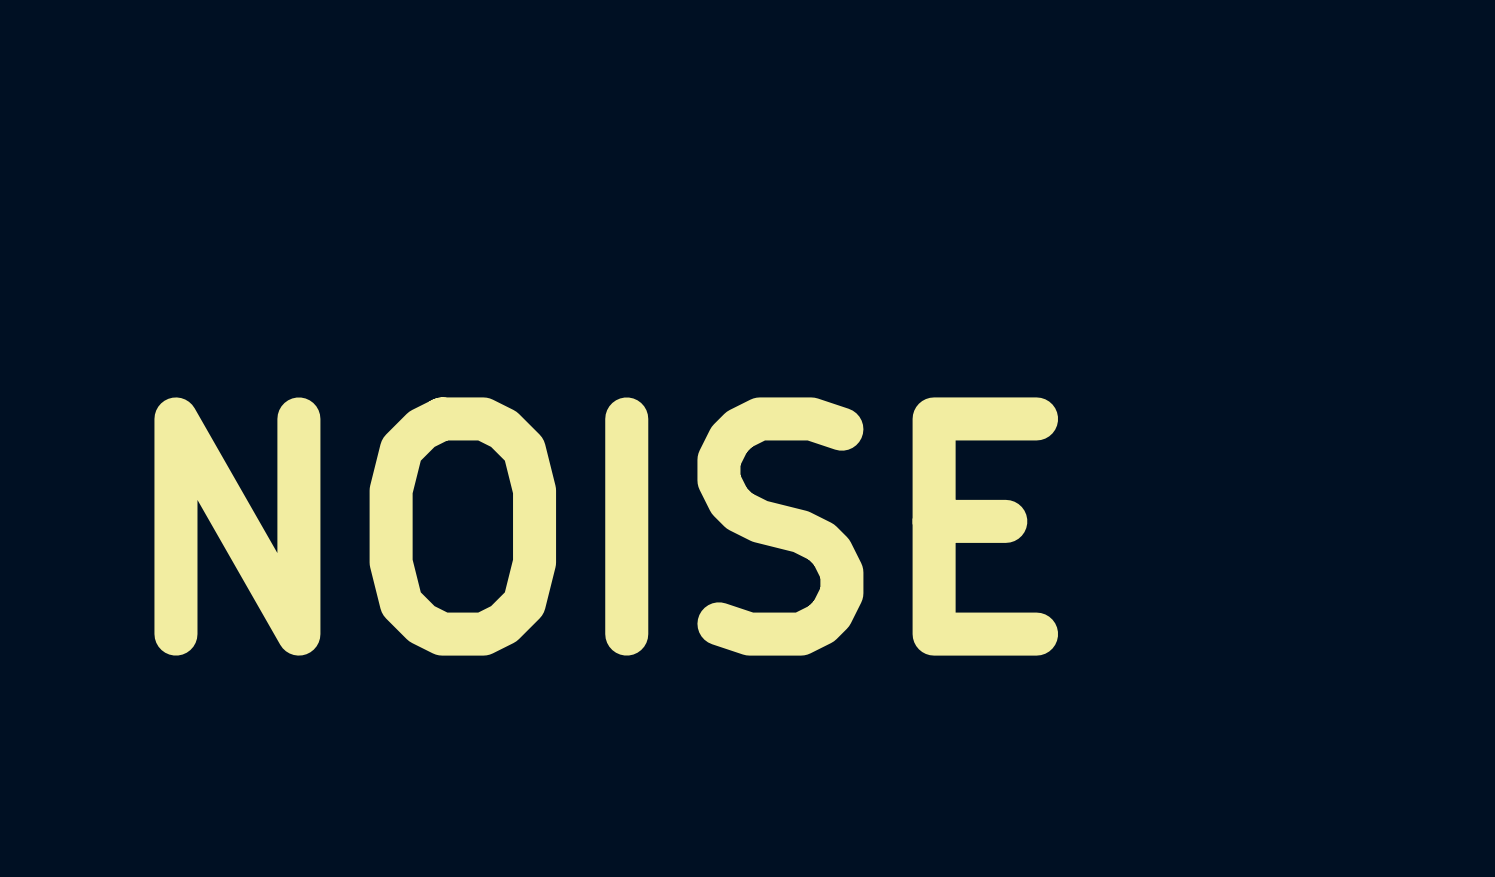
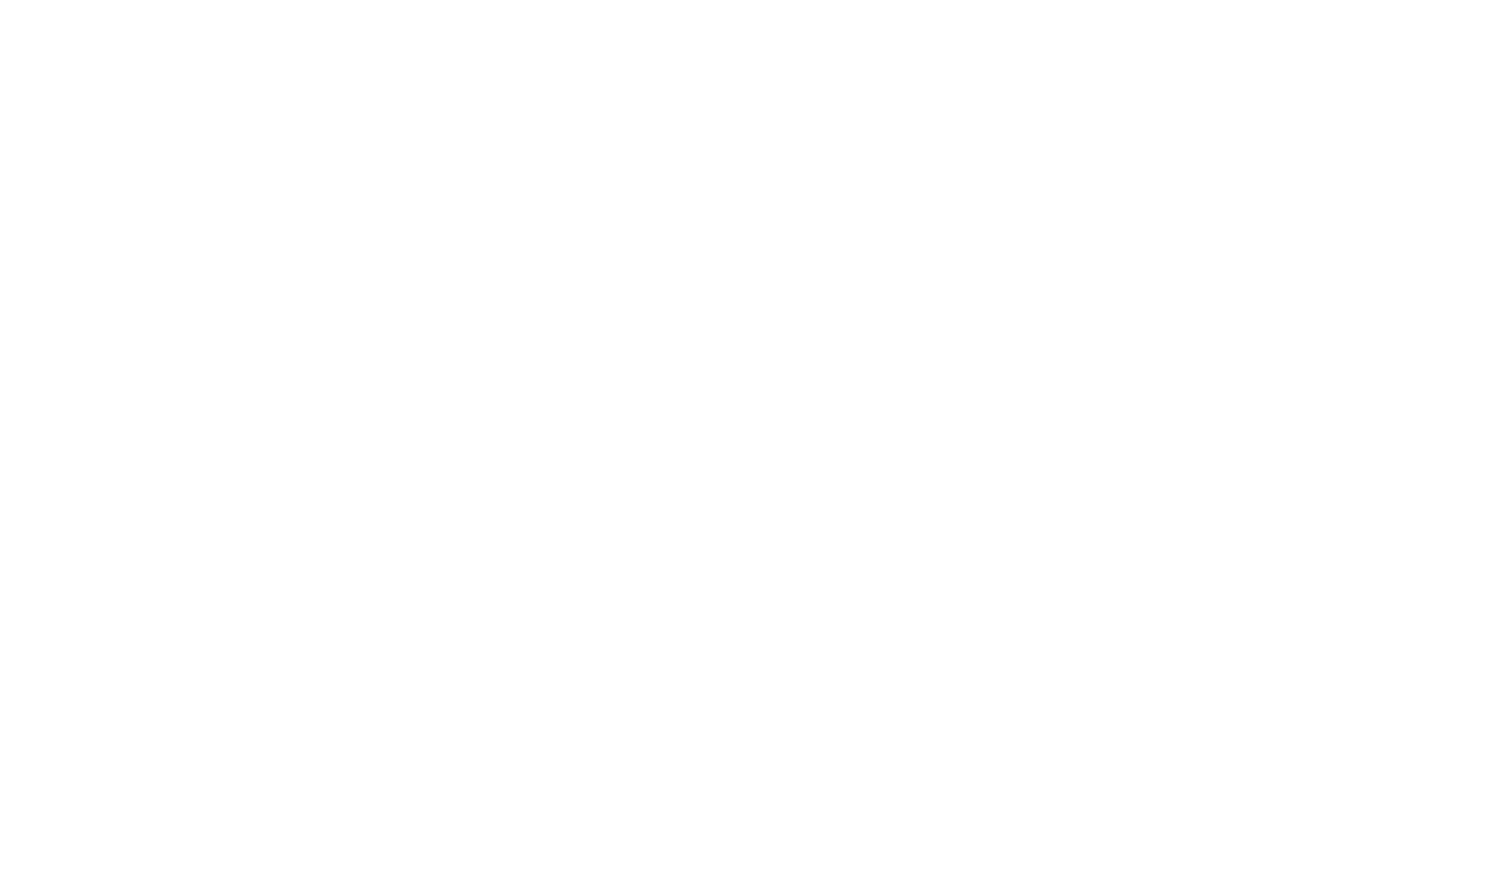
text: NOISE (606, 526) -> none

